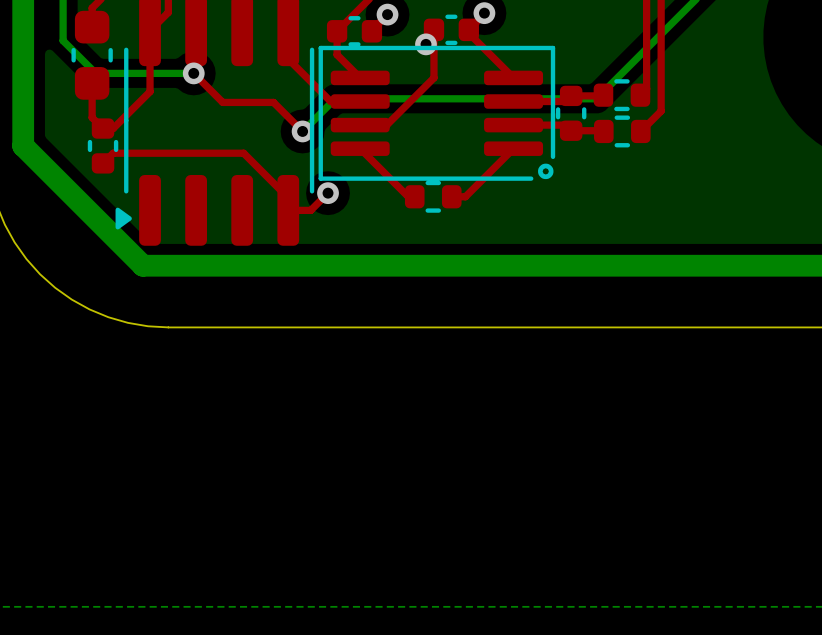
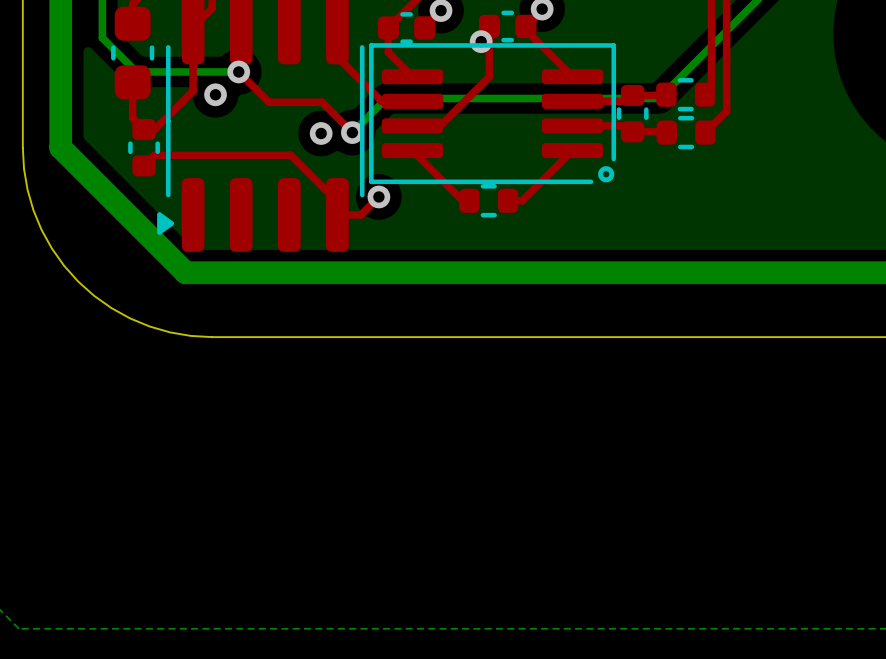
via: none -> (215, 94)
via: none -> (321, 133)

